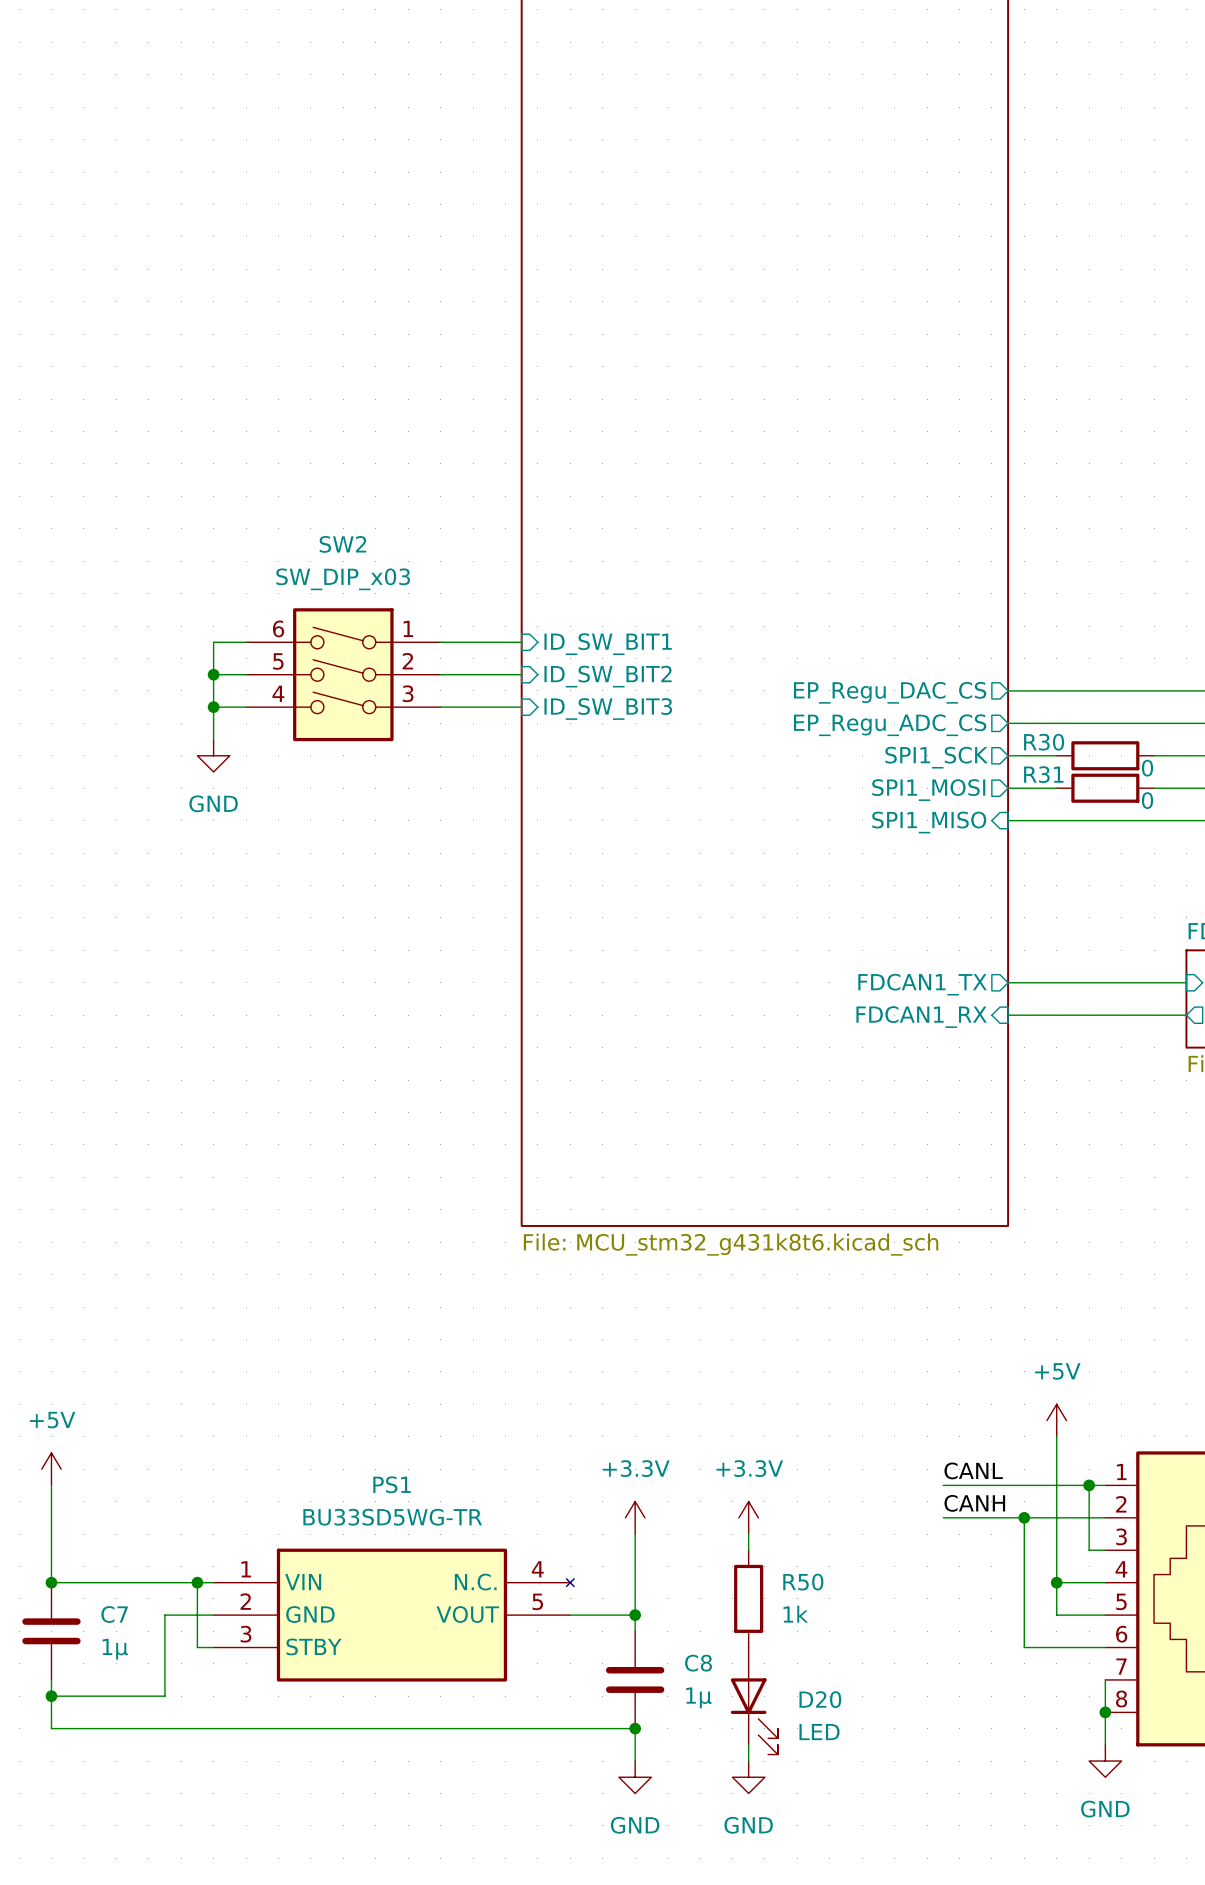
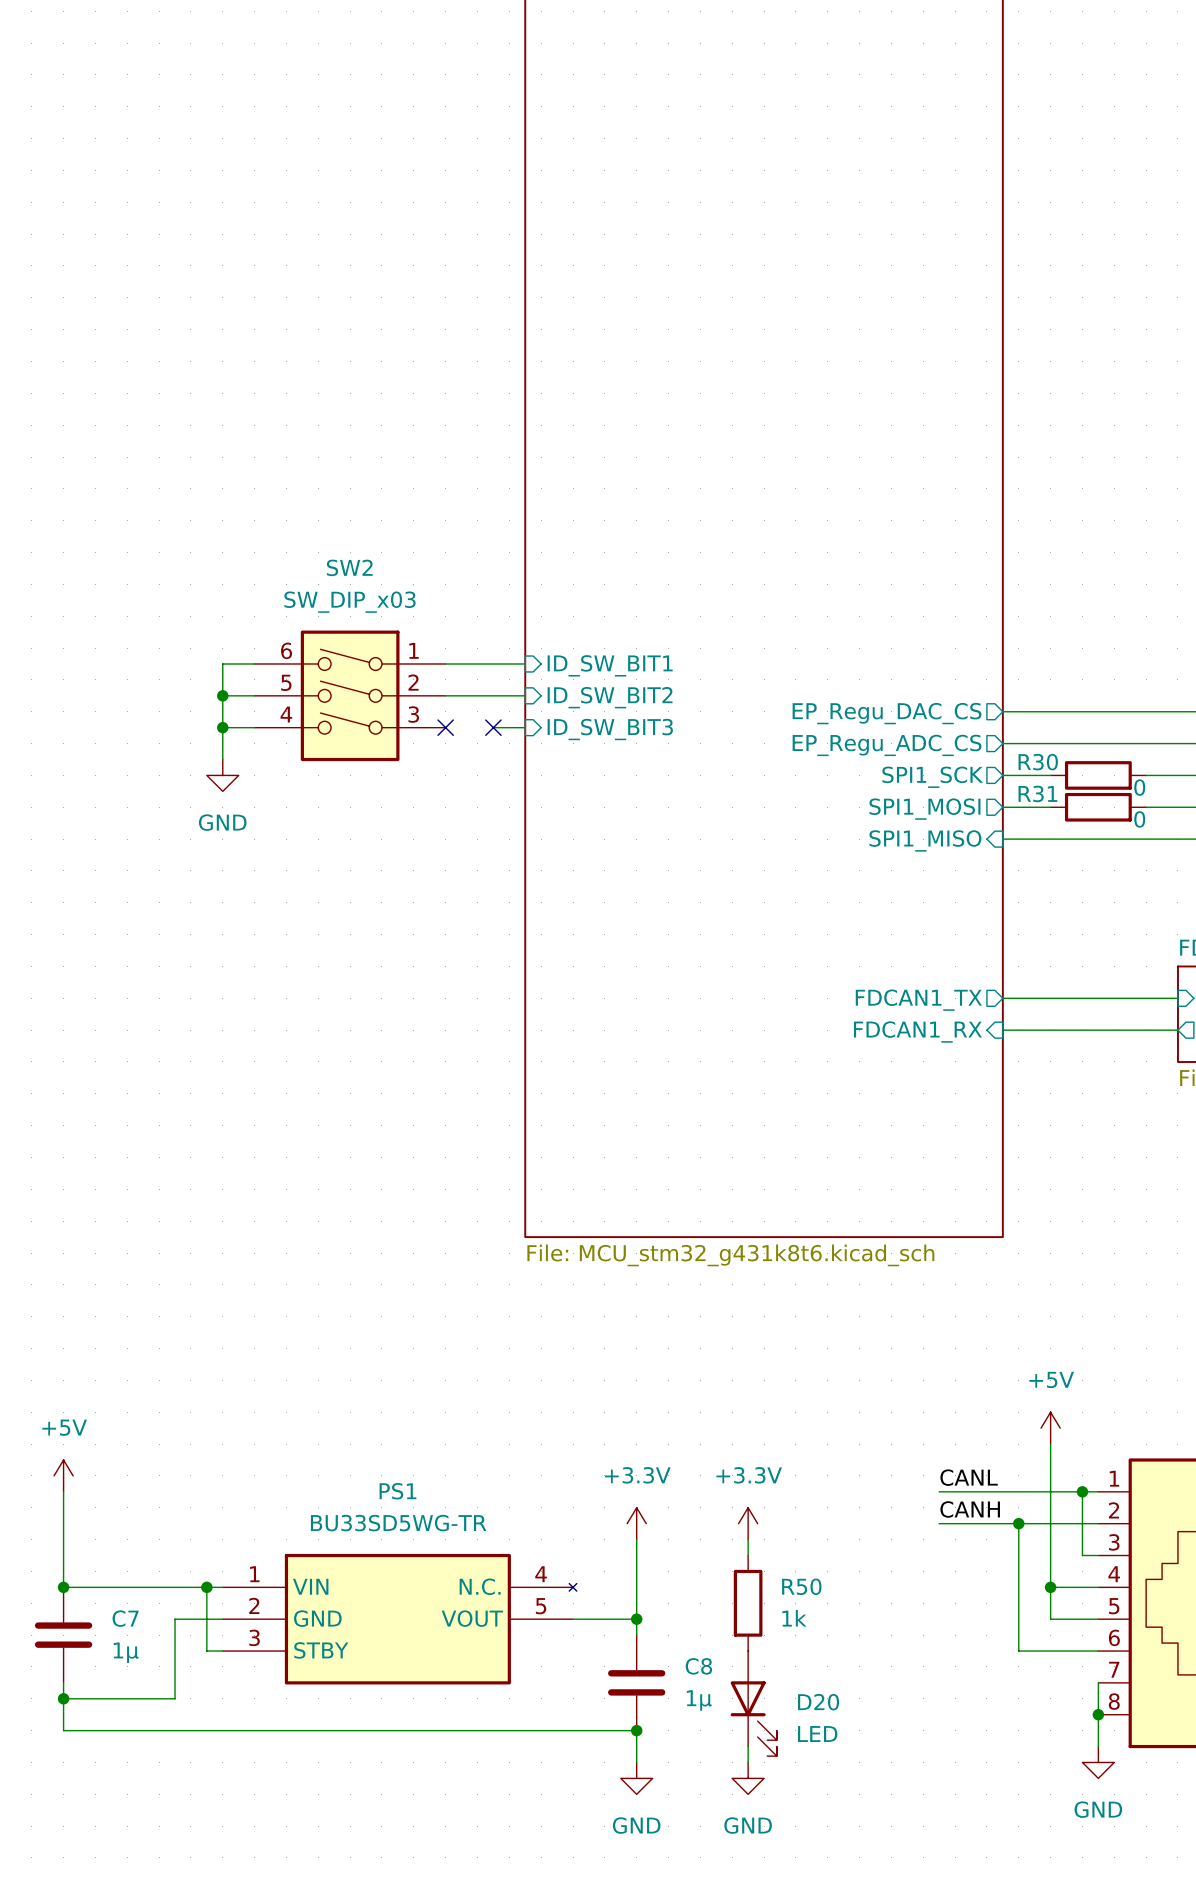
wire: (440, 707) (489, 707) -> none
no-connect mark: none -> (445, 727)
no-connect mark: none -> (493, 727)

